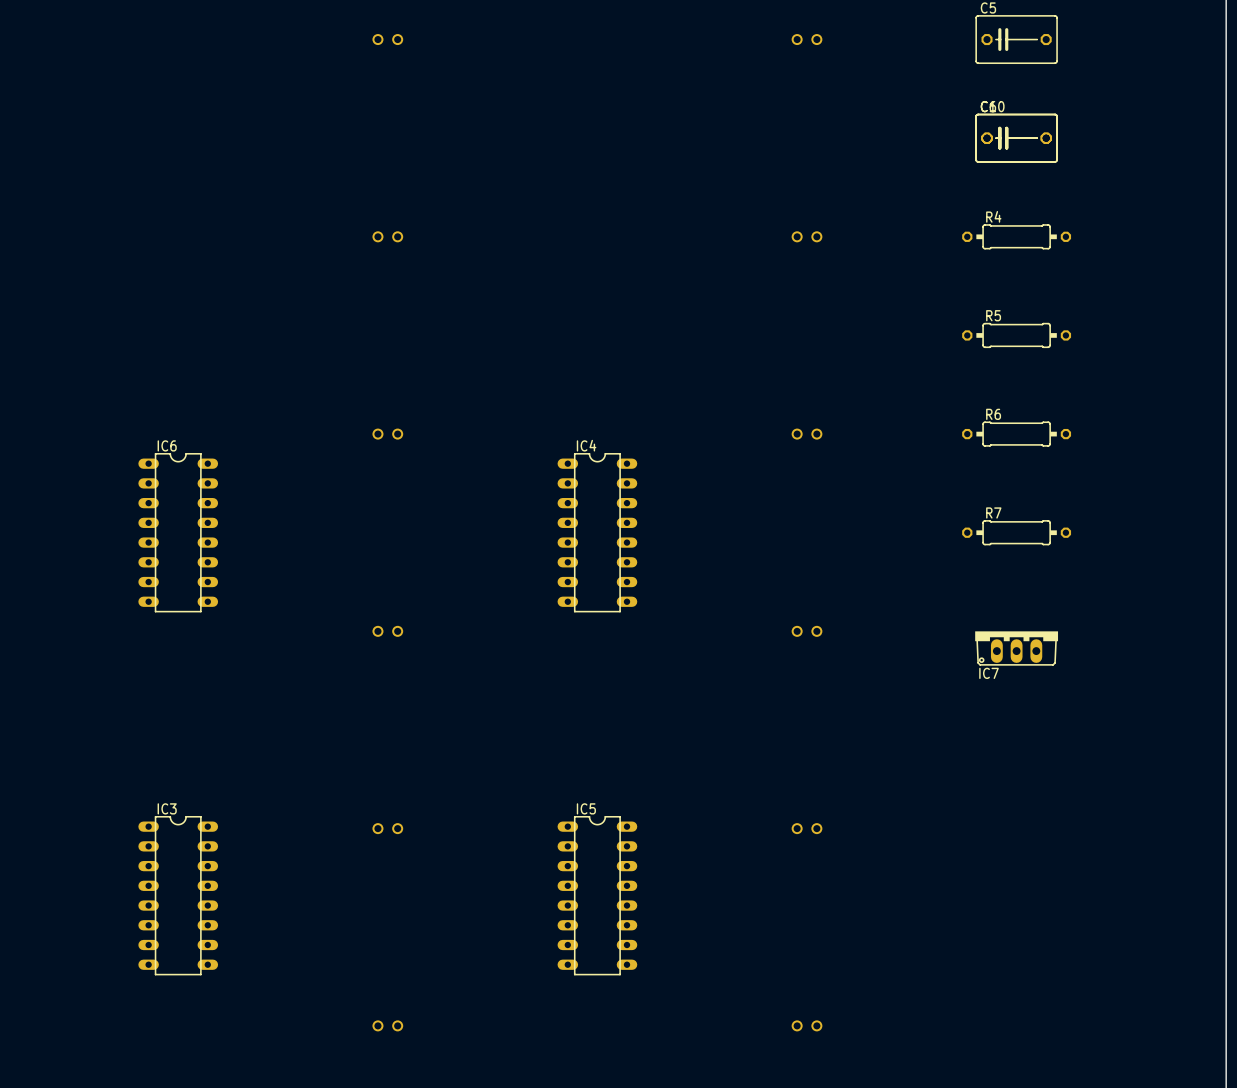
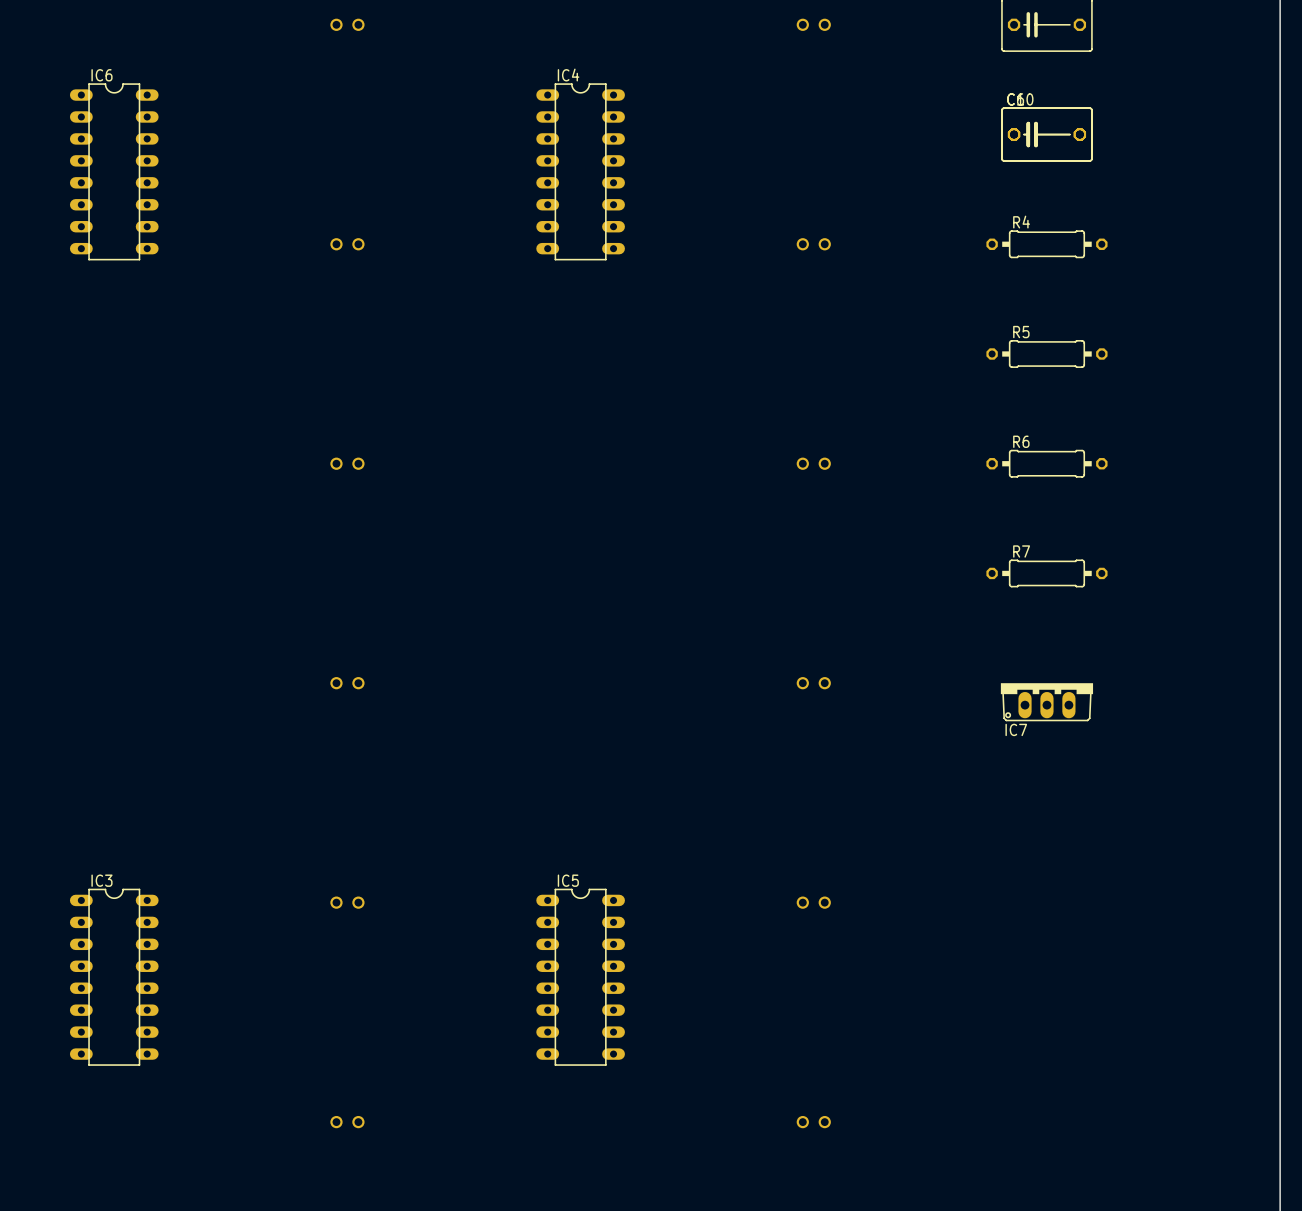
IC6 position: (178, 532) -> (114, 171)
IC4 position: (597, 532) -> (580, 171)

